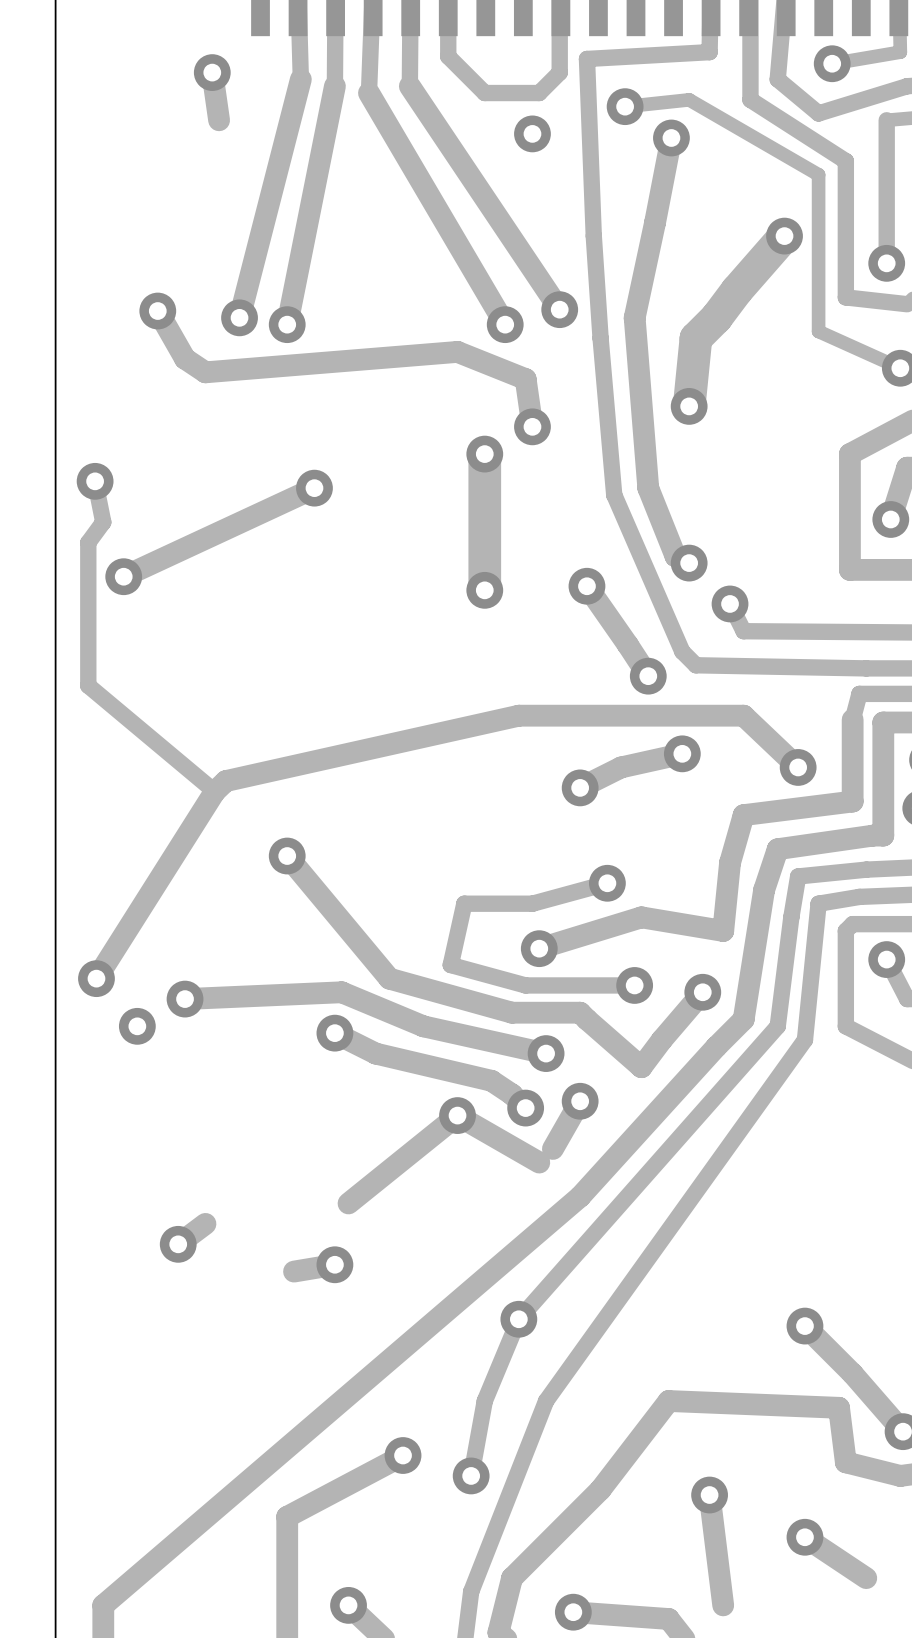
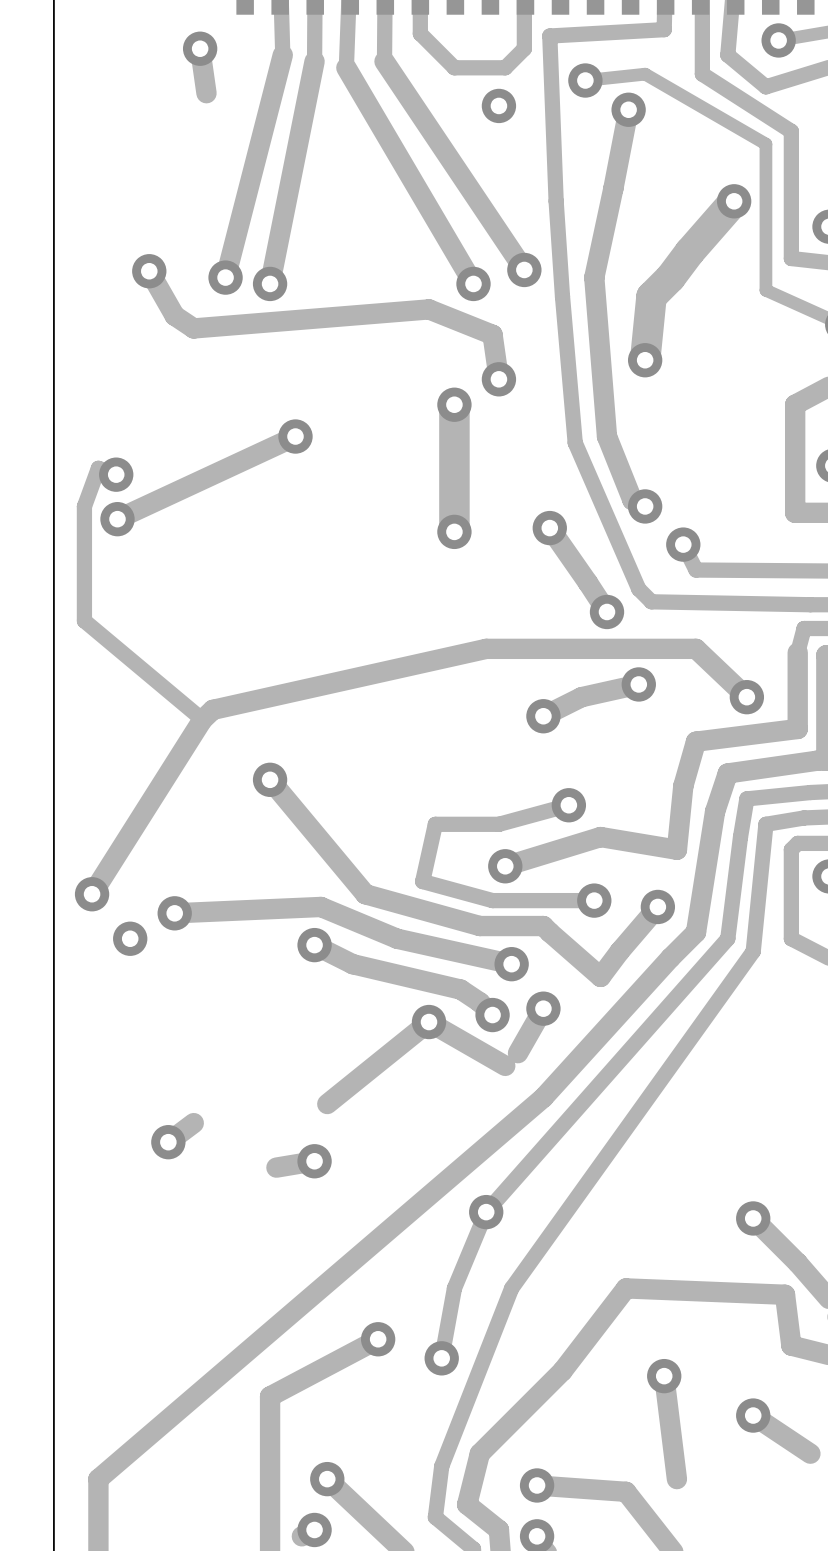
track: (95, 481) (103, 522) (88, 542) (88, 563) -> (116, 474) (98, 468) (84, 506)
via position: (95, 481) -> (116, 474)

